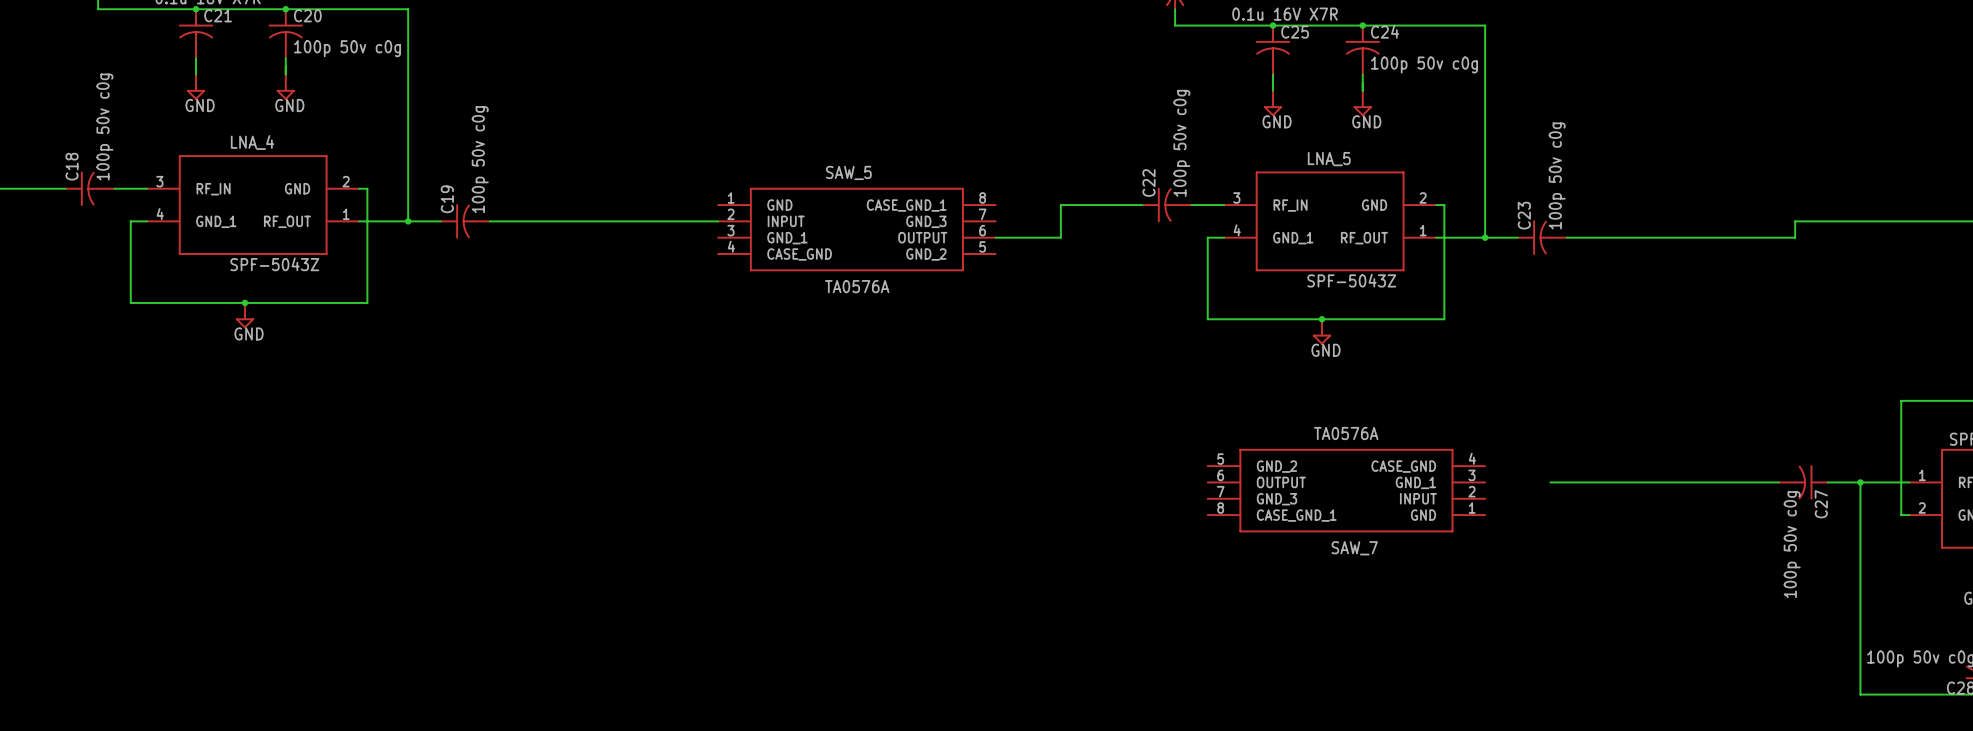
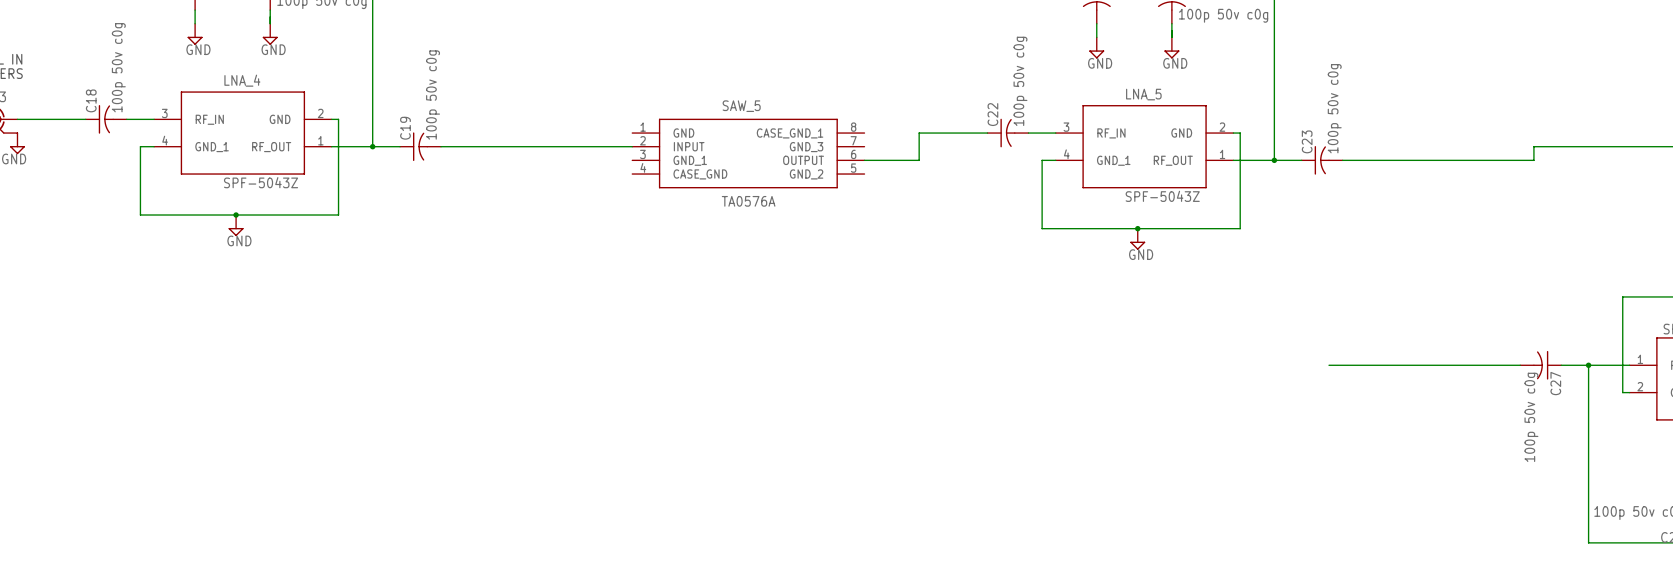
SAW_7: TA0576A (1346, 490) -> none

